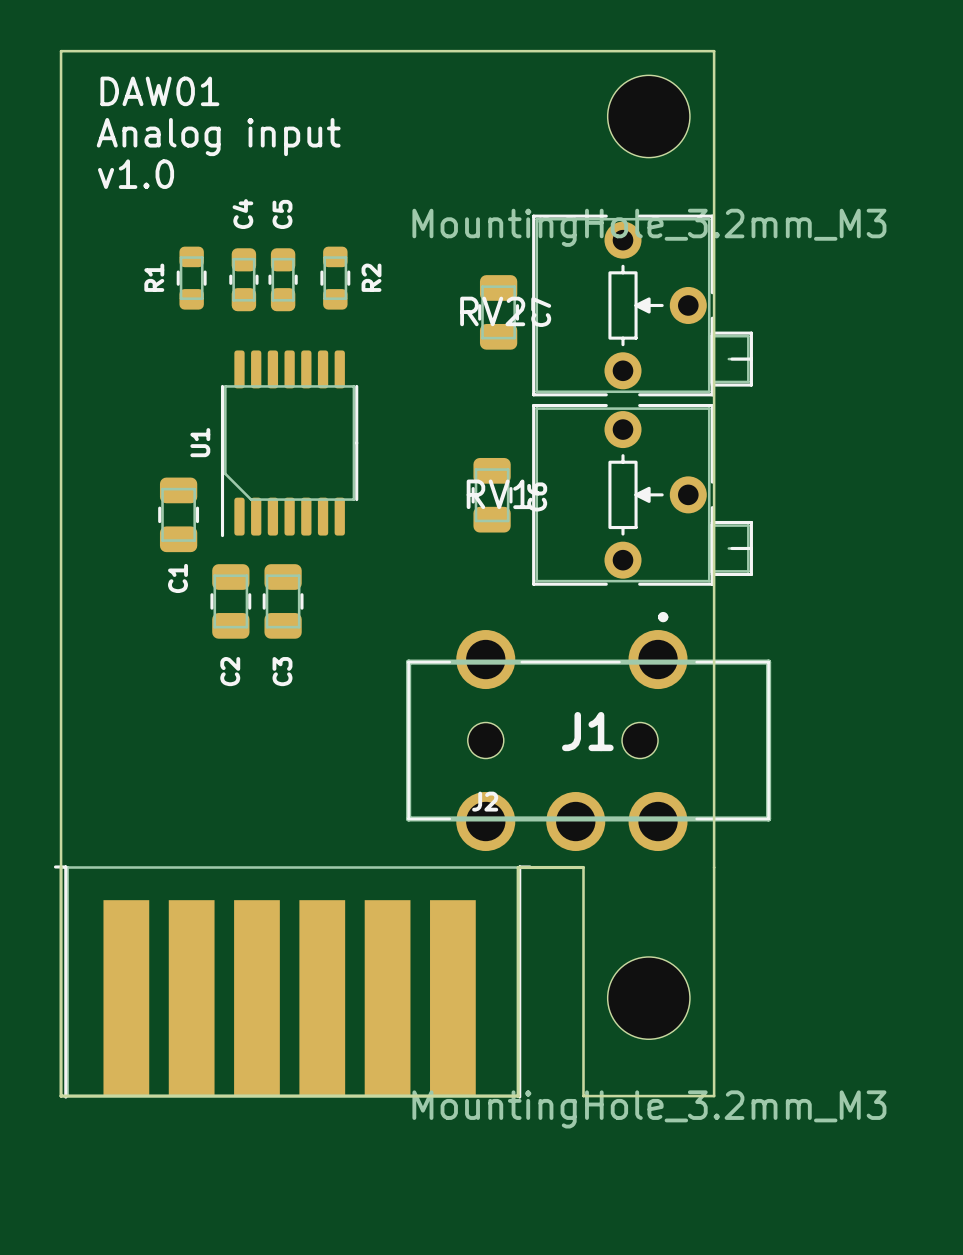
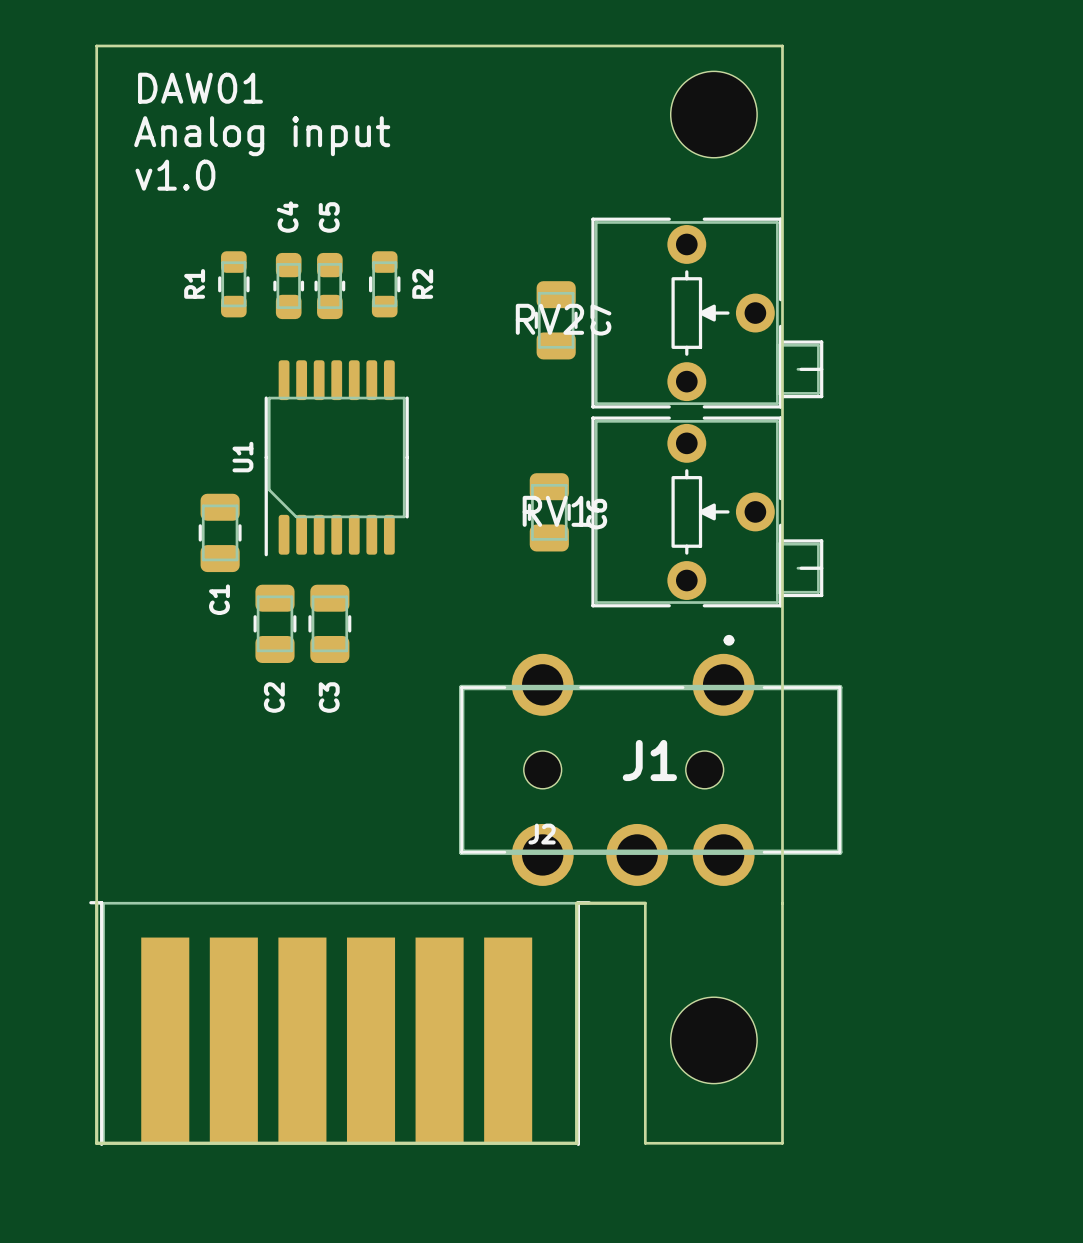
part value: MountingHole_3.2mm_M3 (649, 227) -> none
part value: MountingHole_3.2mm_M3 (649, 1109) -> none

